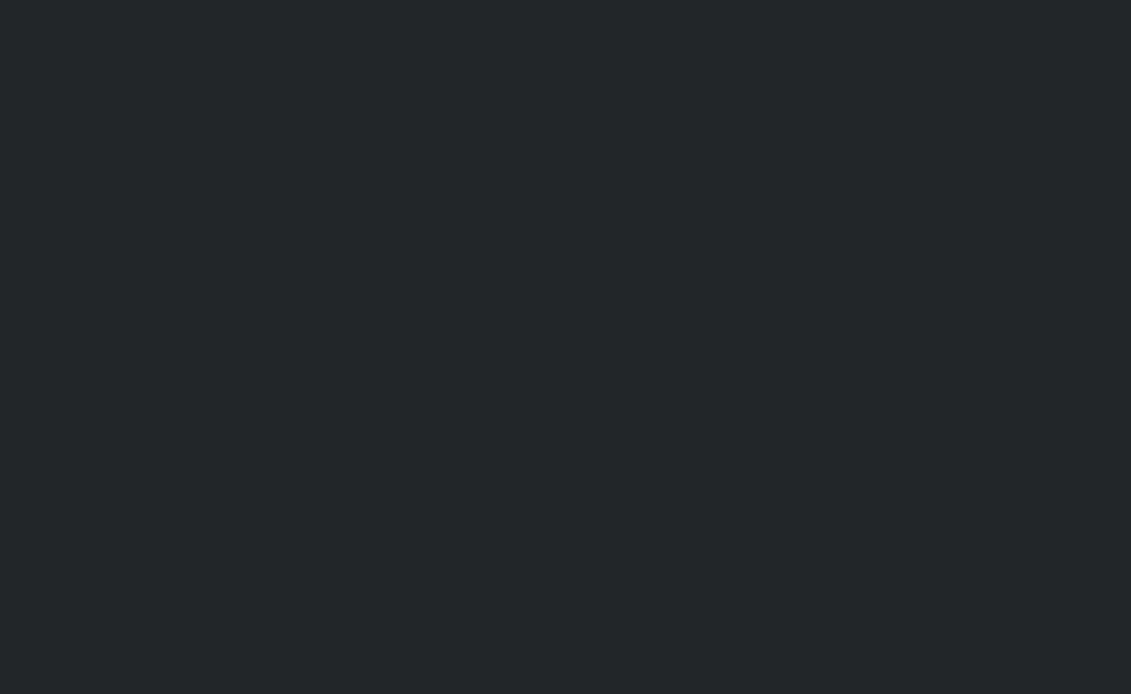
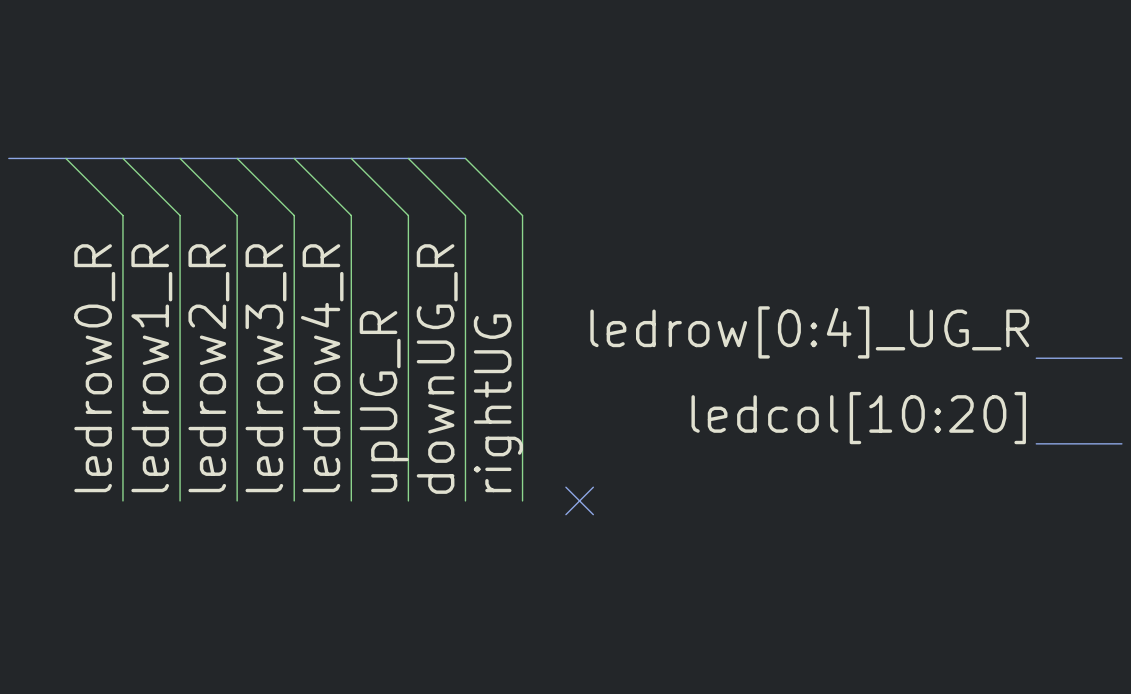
bus: none -> (8, 158) (465, 158)
wire: none -> (65, 158) (122, 215) (122, 500)
wire: none -> (122, 158) (180, 215) (180, 500)
wire: none -> (180, 158) (237, 215) (237, 500)
wire: none -> (237, 158) (294, 215) (294, 500)
wire: none -> (294, 158) (351, 215) (351, 500)
wire: none -> (351, 158) (408, 215) (408, 500)
wire: none -> (408, 158) (465, 215) (465, 500)
wire: none -> (465, 158) (522, 215) (522, 500)
label: none -> ledrow[0:4]_UG_R (809, 332)
bus: none -> (1036, 358) (1121, 358)
label: none -> ledrow0_R (94, 368)
label: none -> ledrow1_R (151, 368)
label: none -> ledrow2_R (208, 368)
label: none -> ledrow3_R (265, 368)
label: none -> ledrow4_R (322, 368)
label: none -> downUG_R (437, 369)
label: none -> upUG_R (384, 401)
label: none -> rightUG (498, 403)
label: none -> ledcol[10:20] (858, 418)
bus: none -> (1036, 443) (1121, 443)
no-connect mark: none -> (579, 500)

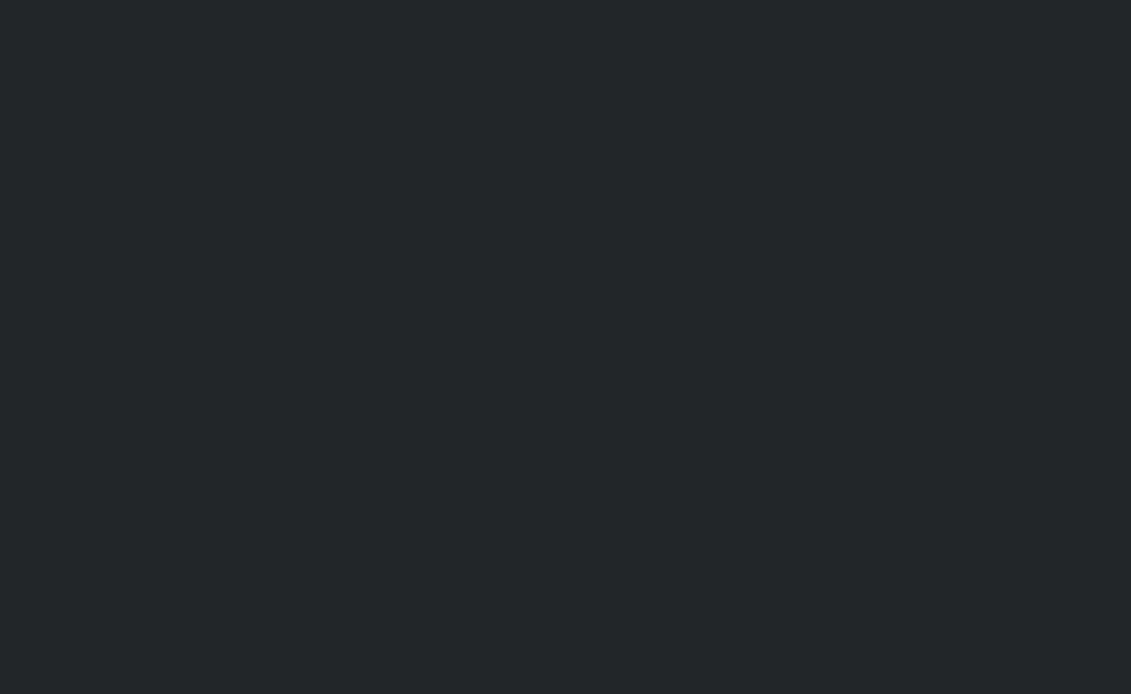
bus: (8, 158) (465, 158) -> none
wire: (65, 158) (122, 215) (122, 500) -> none
wire: (122, 158) (180, 215) (180, 500) -> none
wire: (180, 158) (237, 215) (237, 500) -> none
wire: (237, 158) (294, 215) (294, 500) -> none
wire: (294, 158) (351, 215) (351, 500) -> none
wire: (351, 158) (408, 215) (408, 500) -> none
wire: (408, 158) (465, 215) (465, 500) -> none
wire: (465, 158) (522, 215) (522, 500) -> none
label: ledrow[0:4]_UG_R (809, 332) -> none
bus: (1036, 358) (1121, 358) -> none
label: ledrow0_R (94, 368) -> none
label: ledrow1_R (151, 368) -> none
label: ledrow2_R (208, 368) -> none
label: ledrow3_R (265, 368) -> none
label: ledrow4_R (322, 368) -> none
label: downUG_R (437, 369) -> none
label: upUG_R (384, 401) -> none
label: rightUG (498, 403) -> none
label: ledcol[10:20] (858, 418) -> none
bus: (1036, 443) (1121, 443) -> none
no-connect mark: (579, 500) -> none

